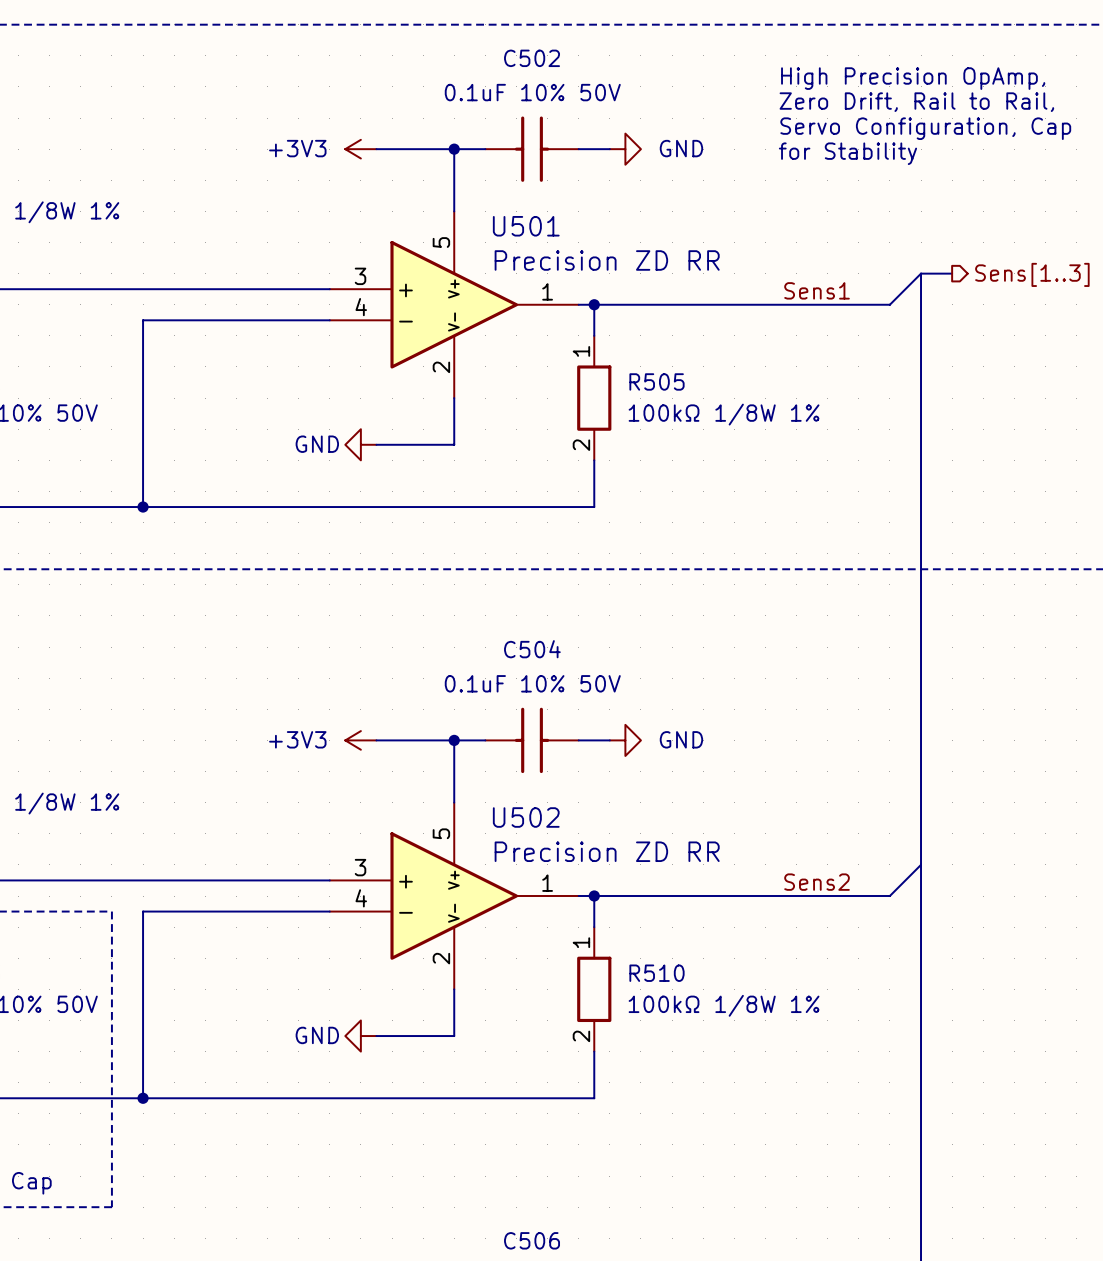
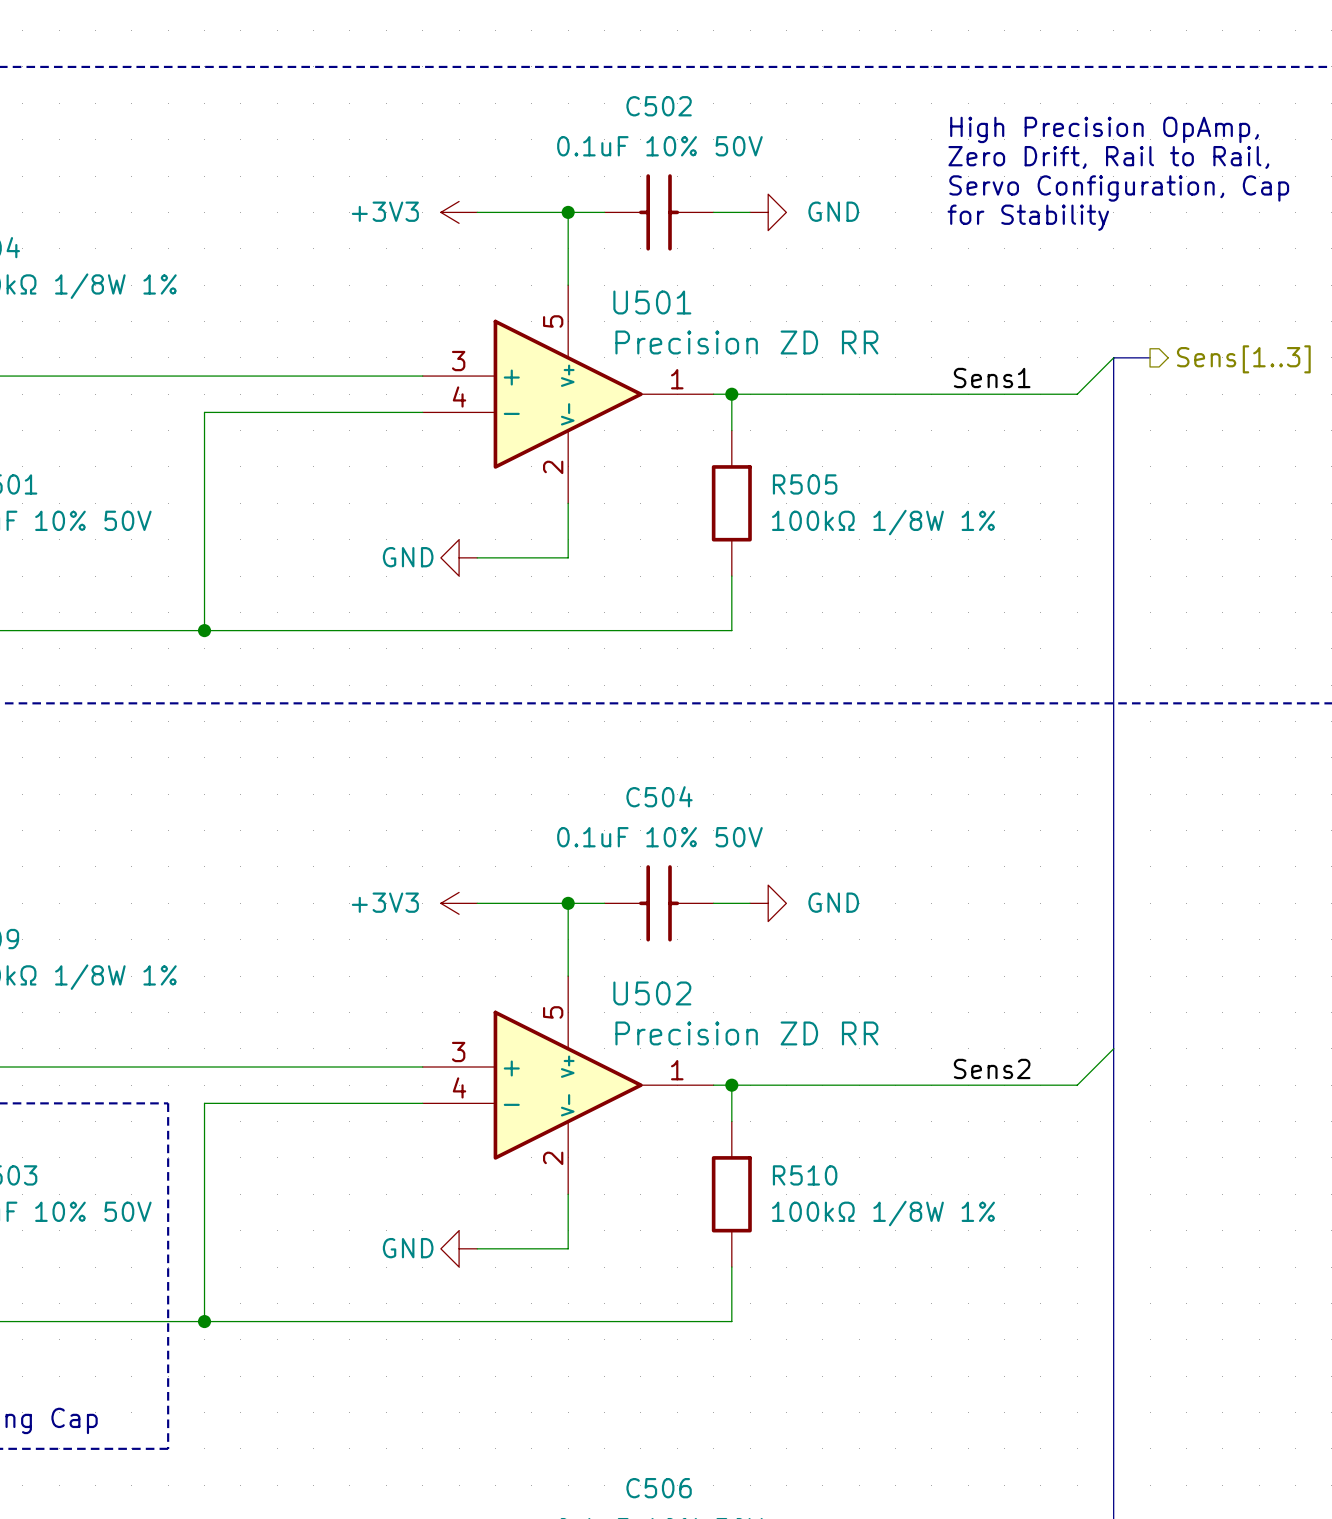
R505 pin number: 1 (581, 351) -> none
R505 pin number: 2 (581, 445) -> none
R510 pin number: 1 (581, 942) -> none
R510 pin number: 2 (581, 1036) -> none

